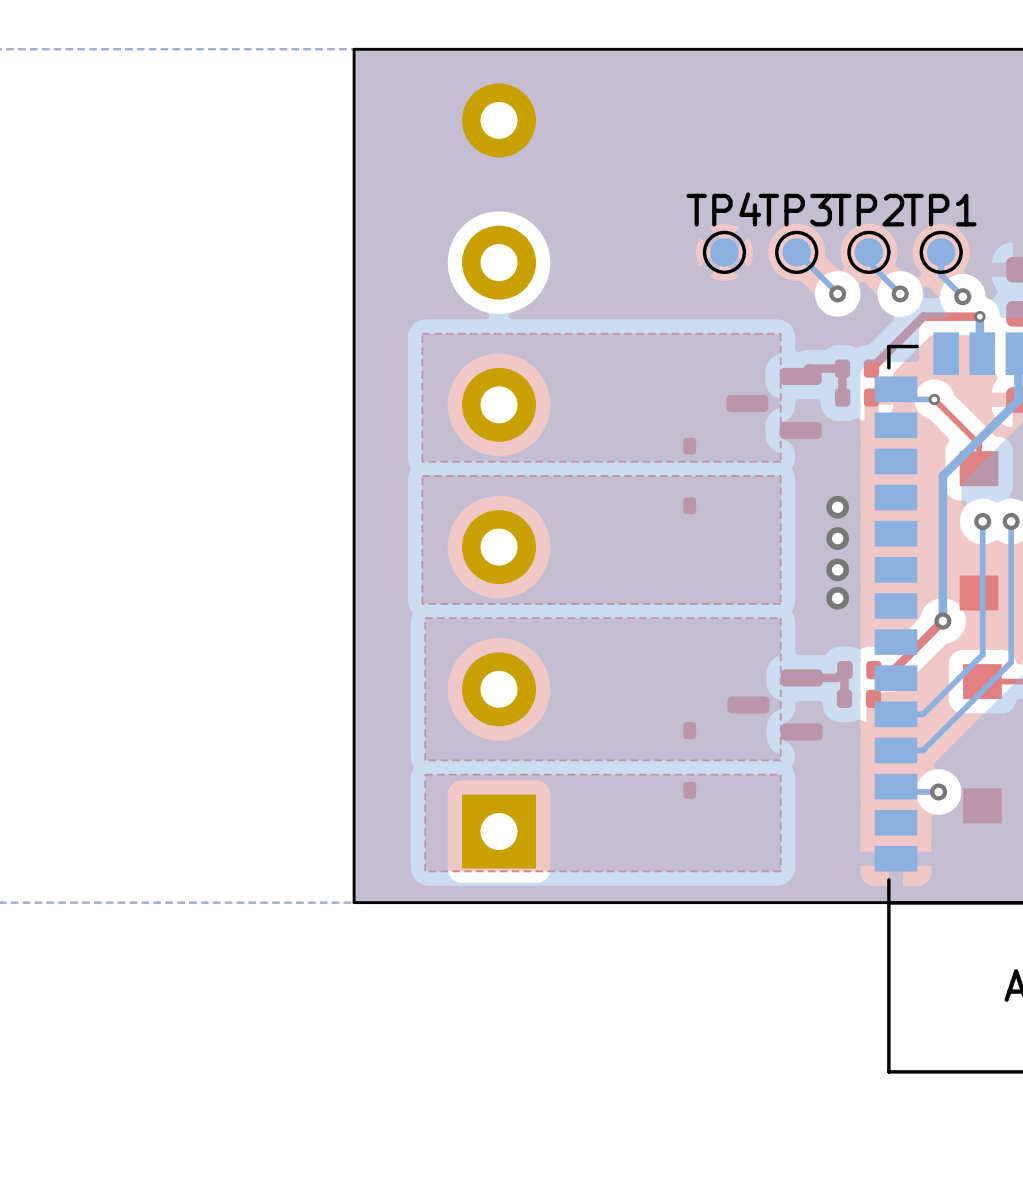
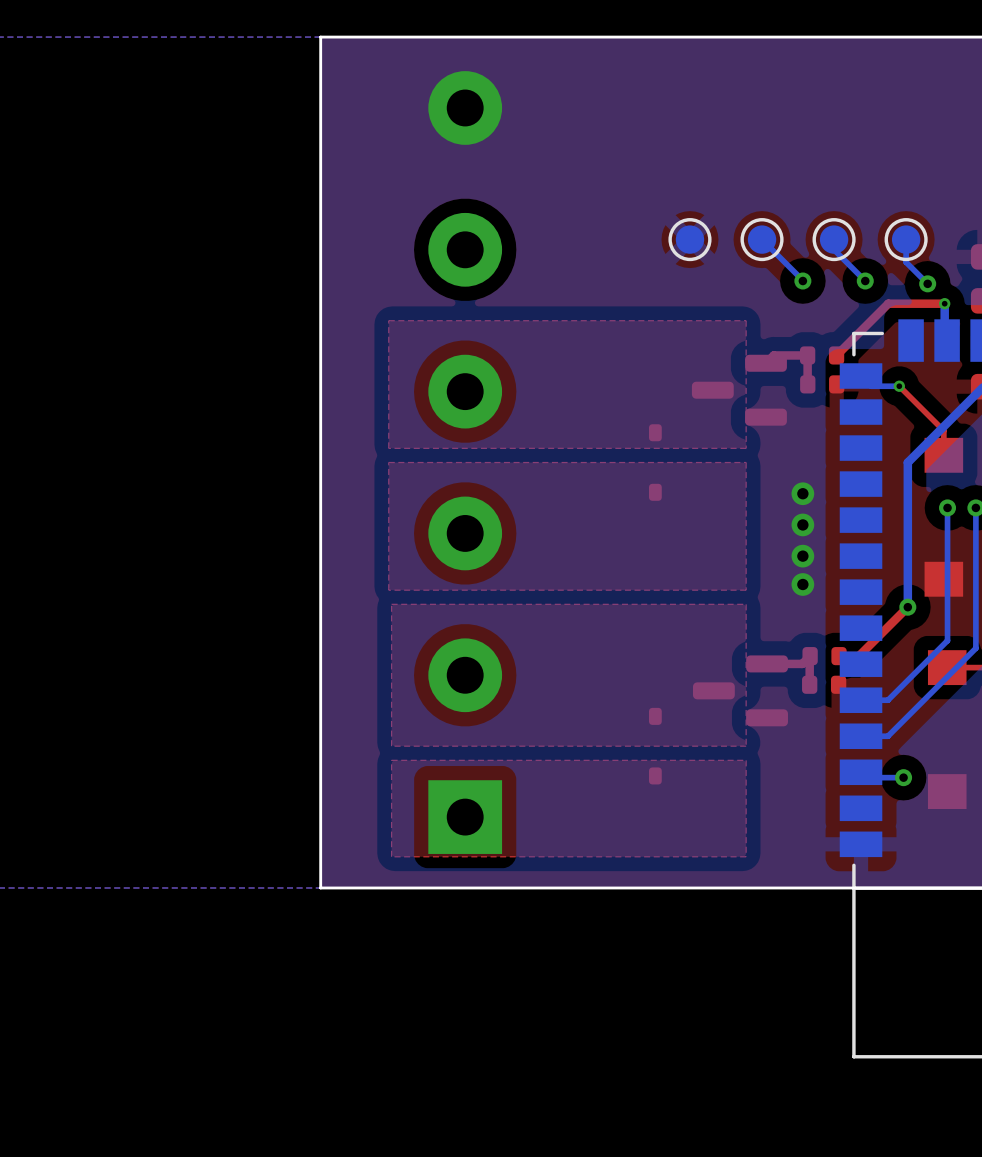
TP4 name: TP4 (723, 209) -> none
TP3 name: TP3 (795, 210) -> none
TP2 name: TP2 (867, 210) -> none
TP1 name: TP1 (939, 210) -> none

